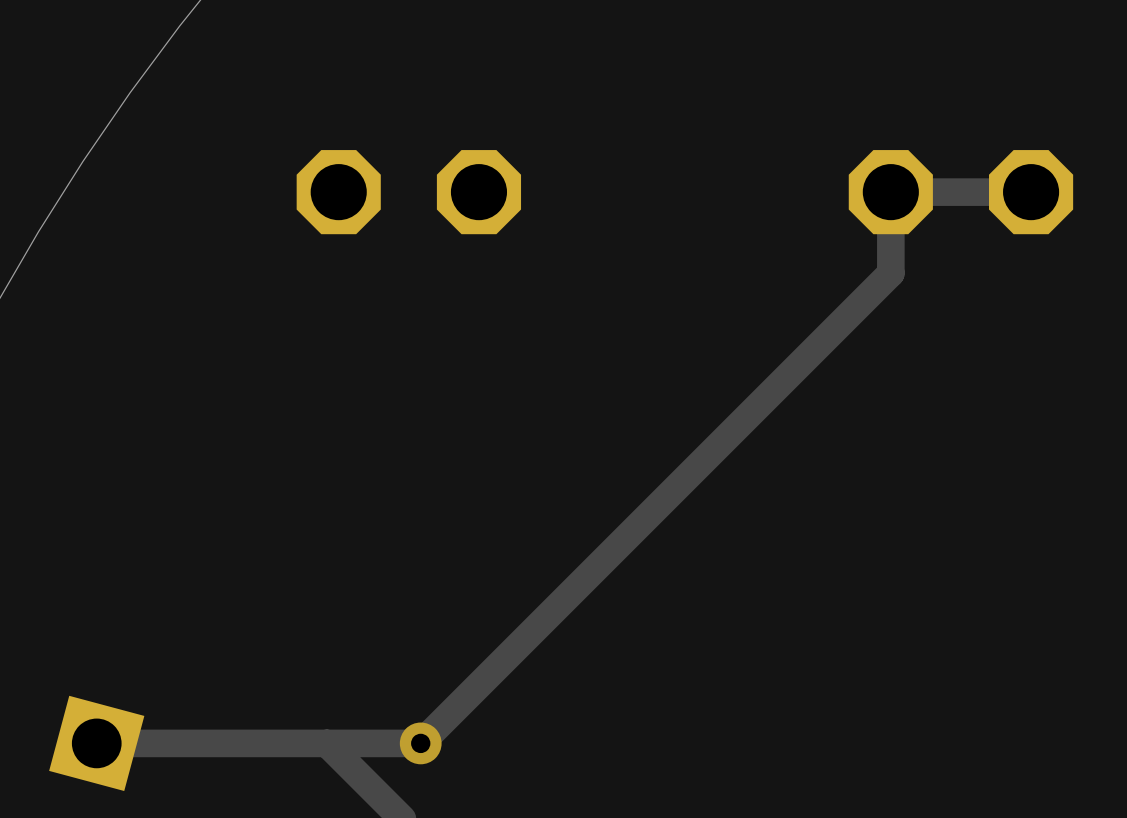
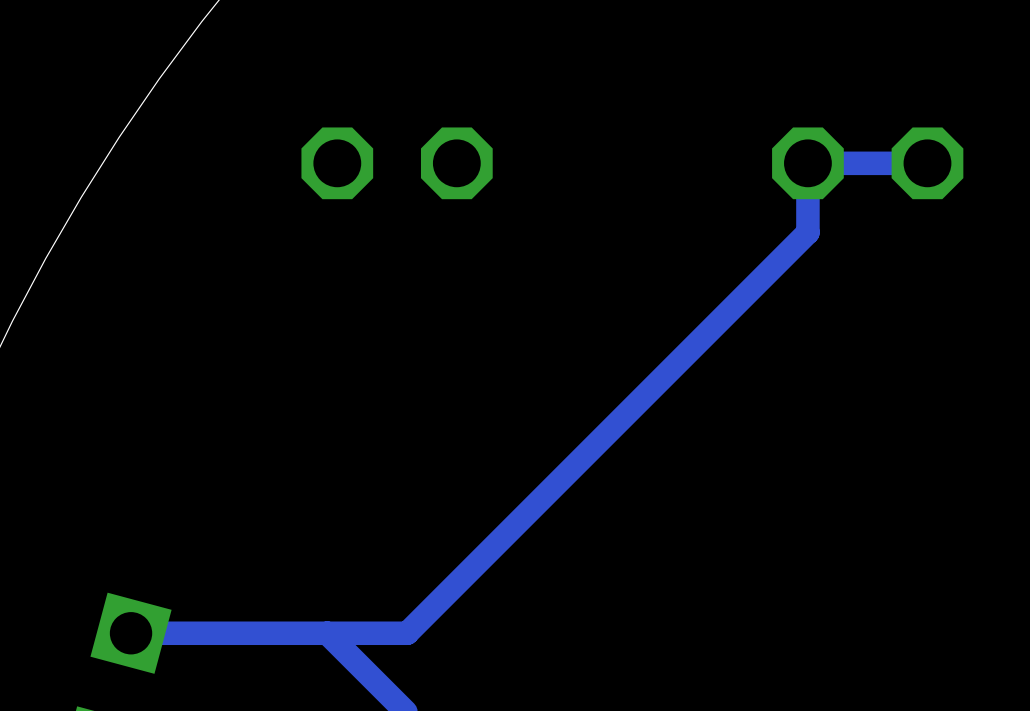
via: (420, 743) -> none

